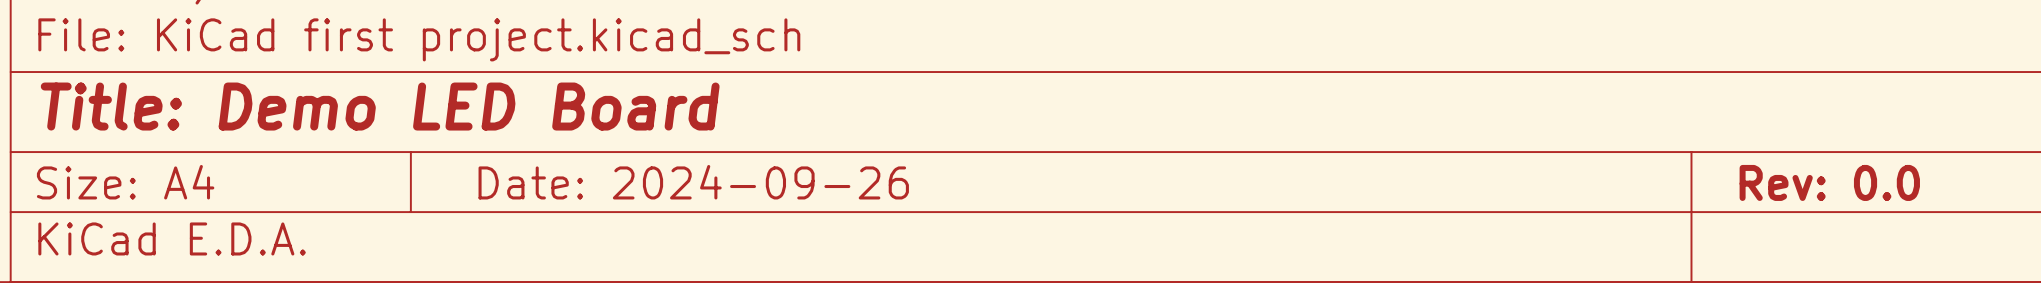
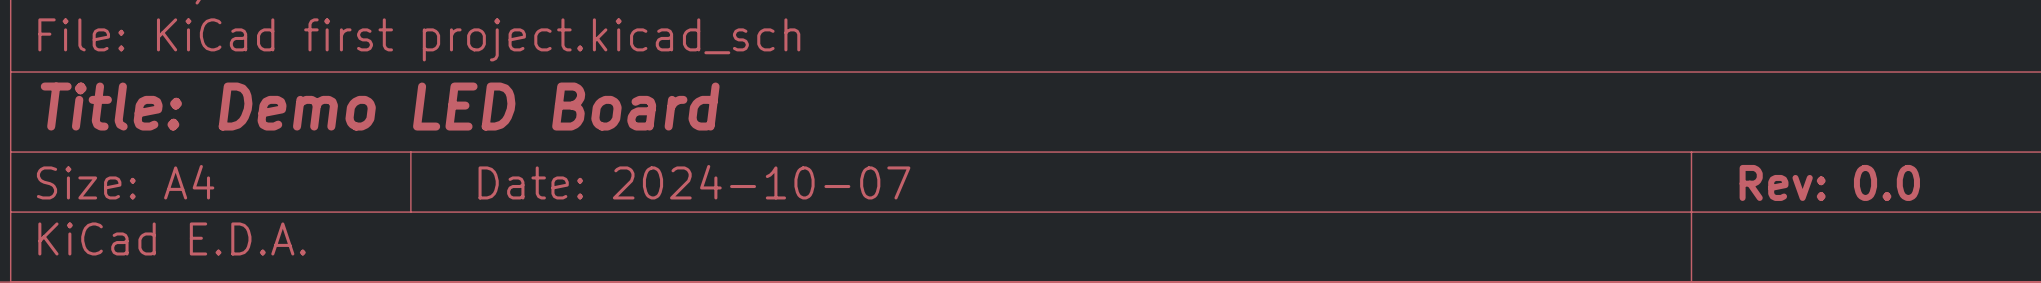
title block: Date: 2024-09-26 (693, 182) -> Date: 2024-10-07 (694, 182)

